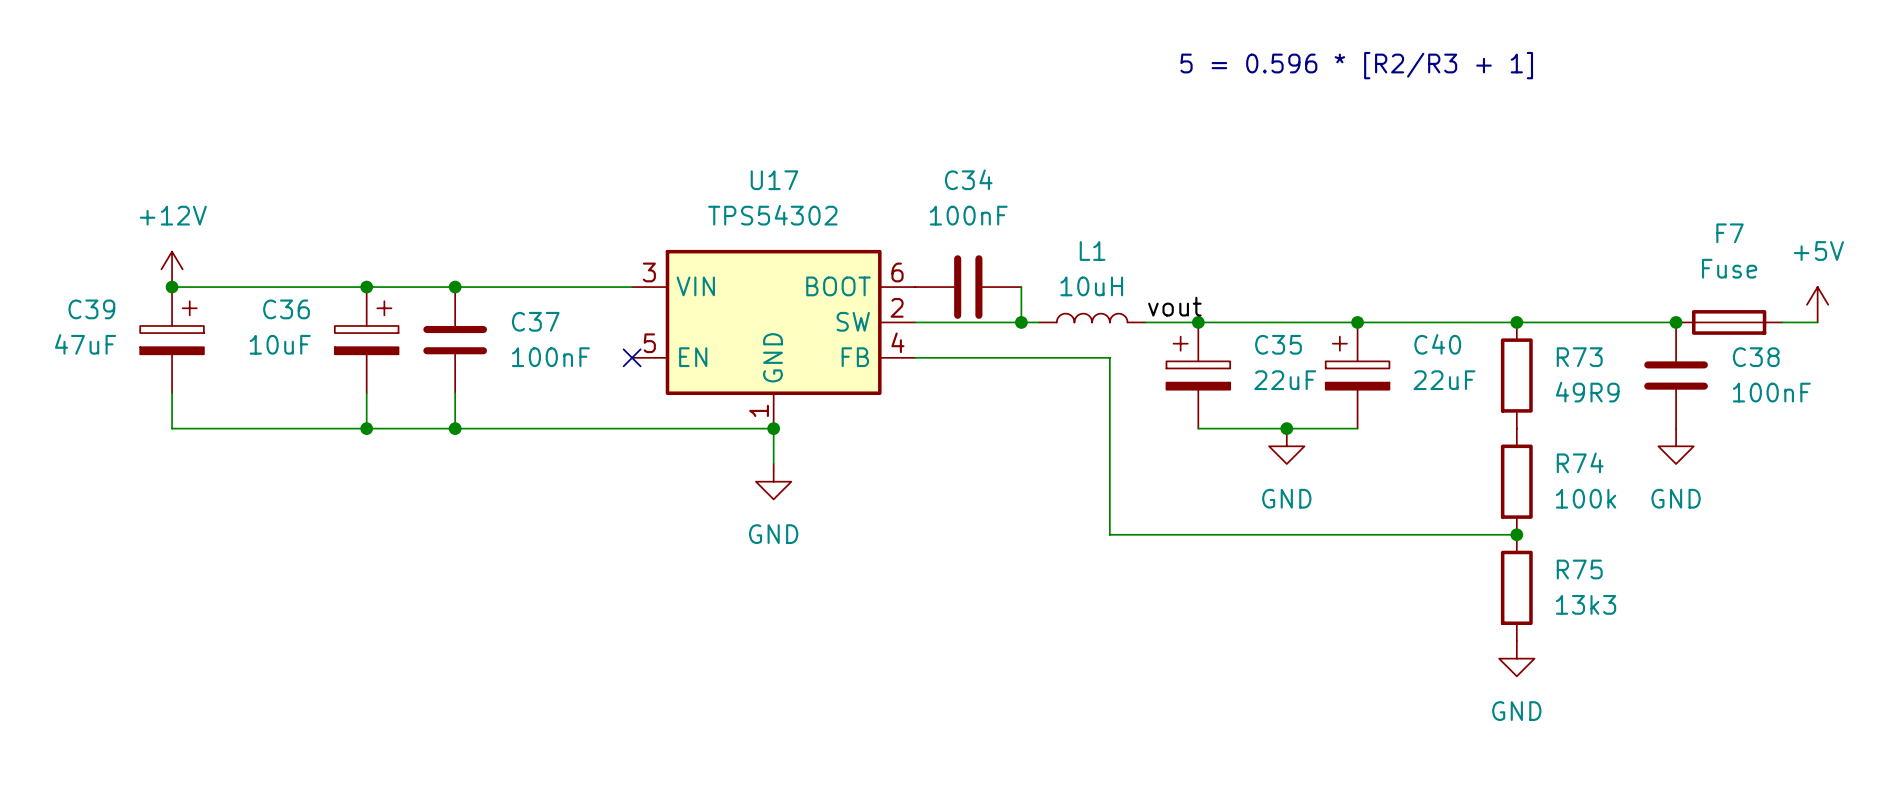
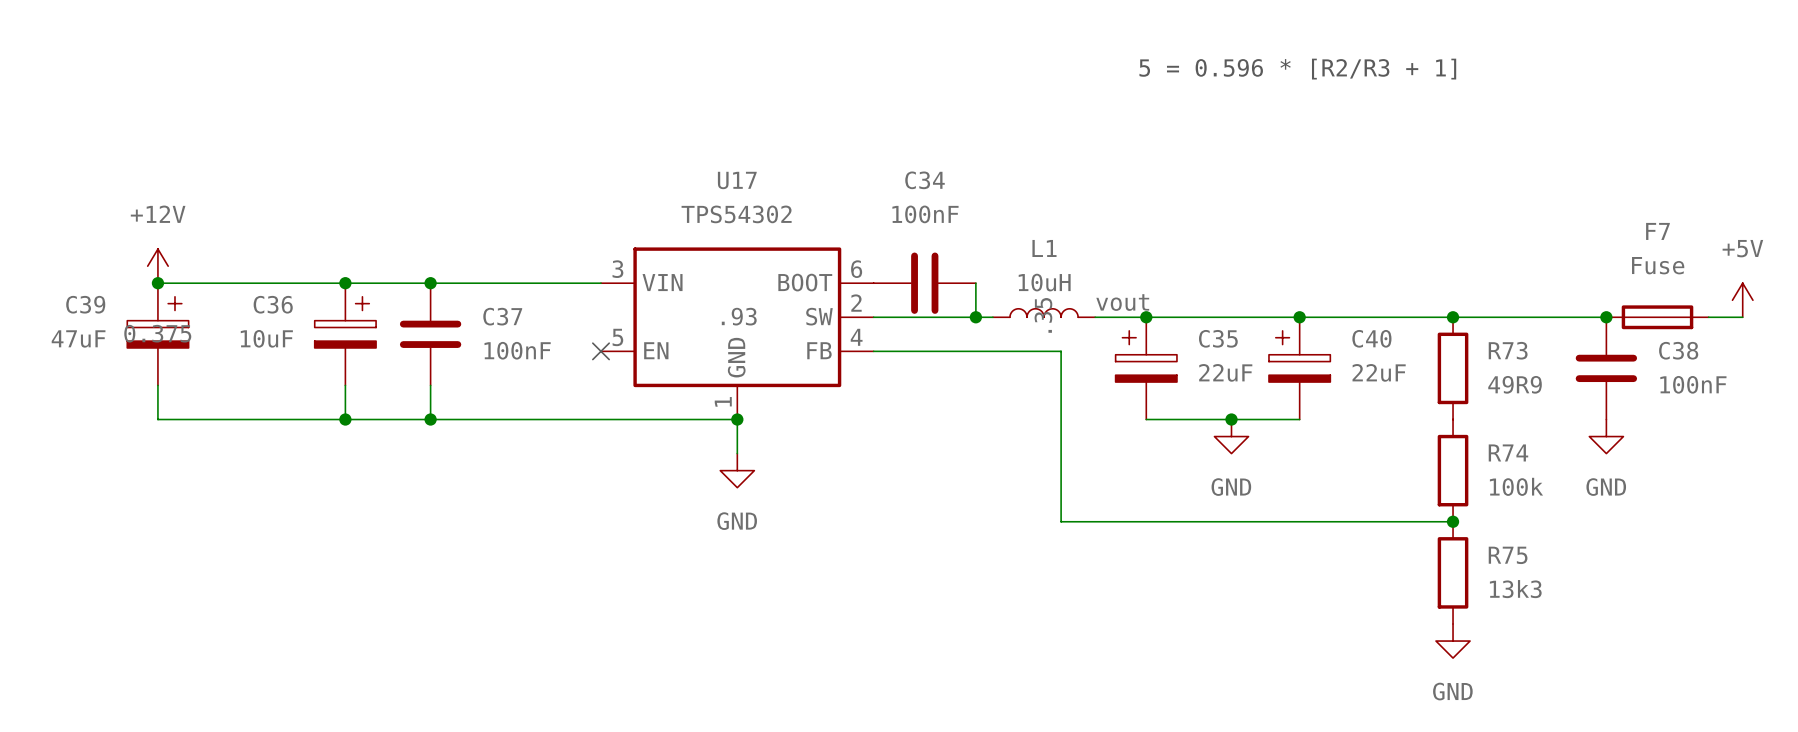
U17 text: none -> .93 (739, 316)
L1 text: none -> .35 (1043, 315)
C39 text: none -> 0.375 (157, 333)

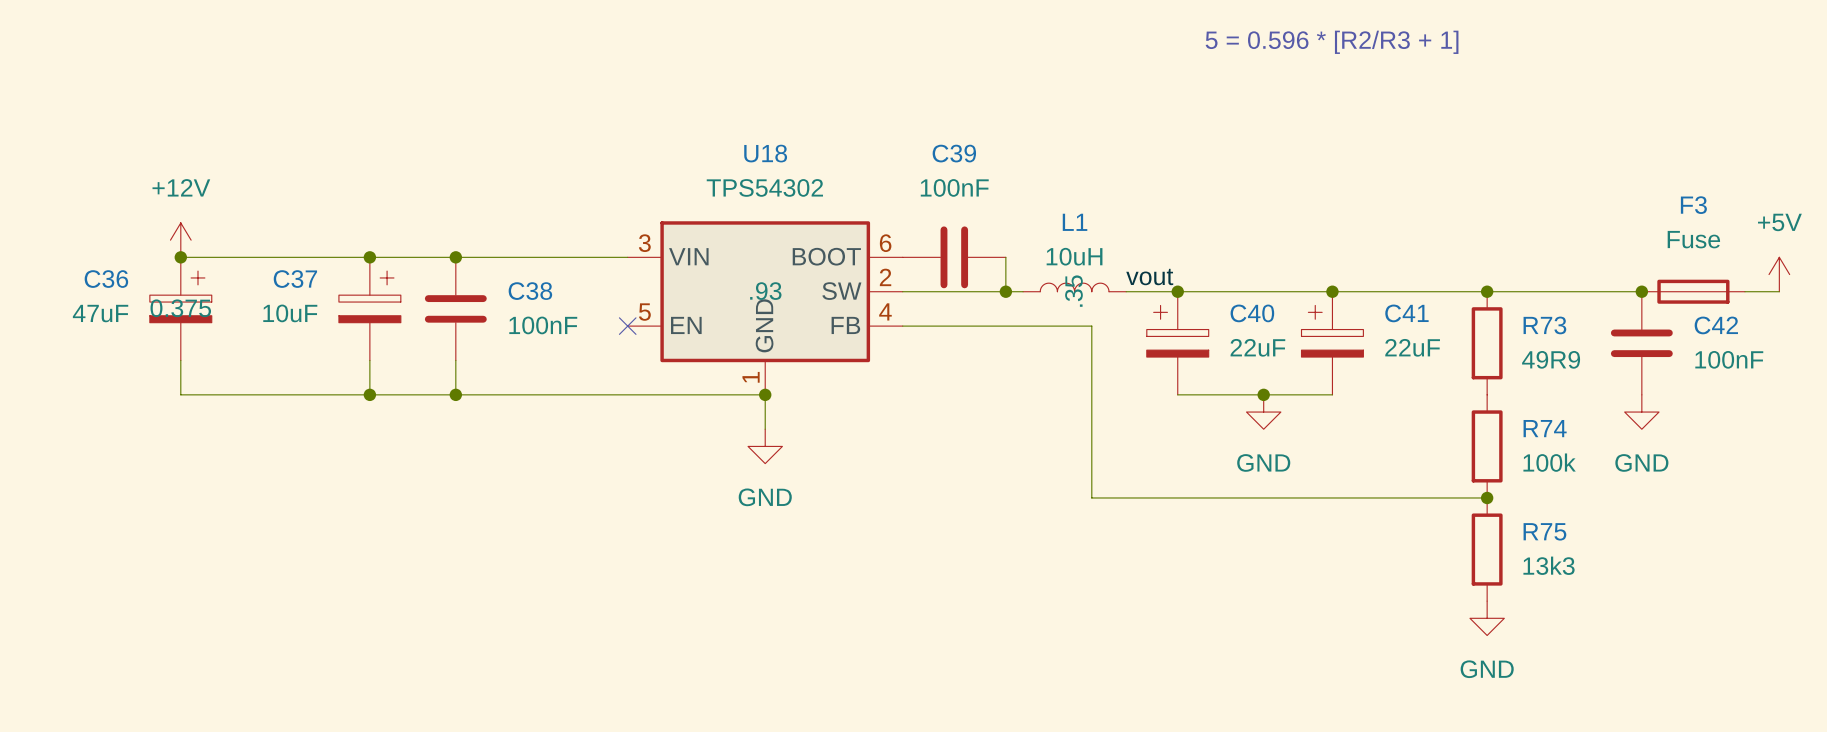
U17 name: U17 (737, 180) -> U18 (765, 153)
C34 name: C34 (925, 180) -> C39 (954, 153)
F7 name: F7 (1657, 231) -> F3 (1693, 205)
C39 name: C39 (85, 304) -> C36 (106, 279)
C36 name: C36 (273, 304) -> C37 (295, 279)
C37 name: C37 (502, 316) -> C38 (530, 291)
C35 name: C35 (1218, 338) -> C40 (1252, 313)
C40 name: C40 (1371, 338) -> C41 (1406, 313)
C38 name: C38 (1678, 350) -> C42 (1716, 325)

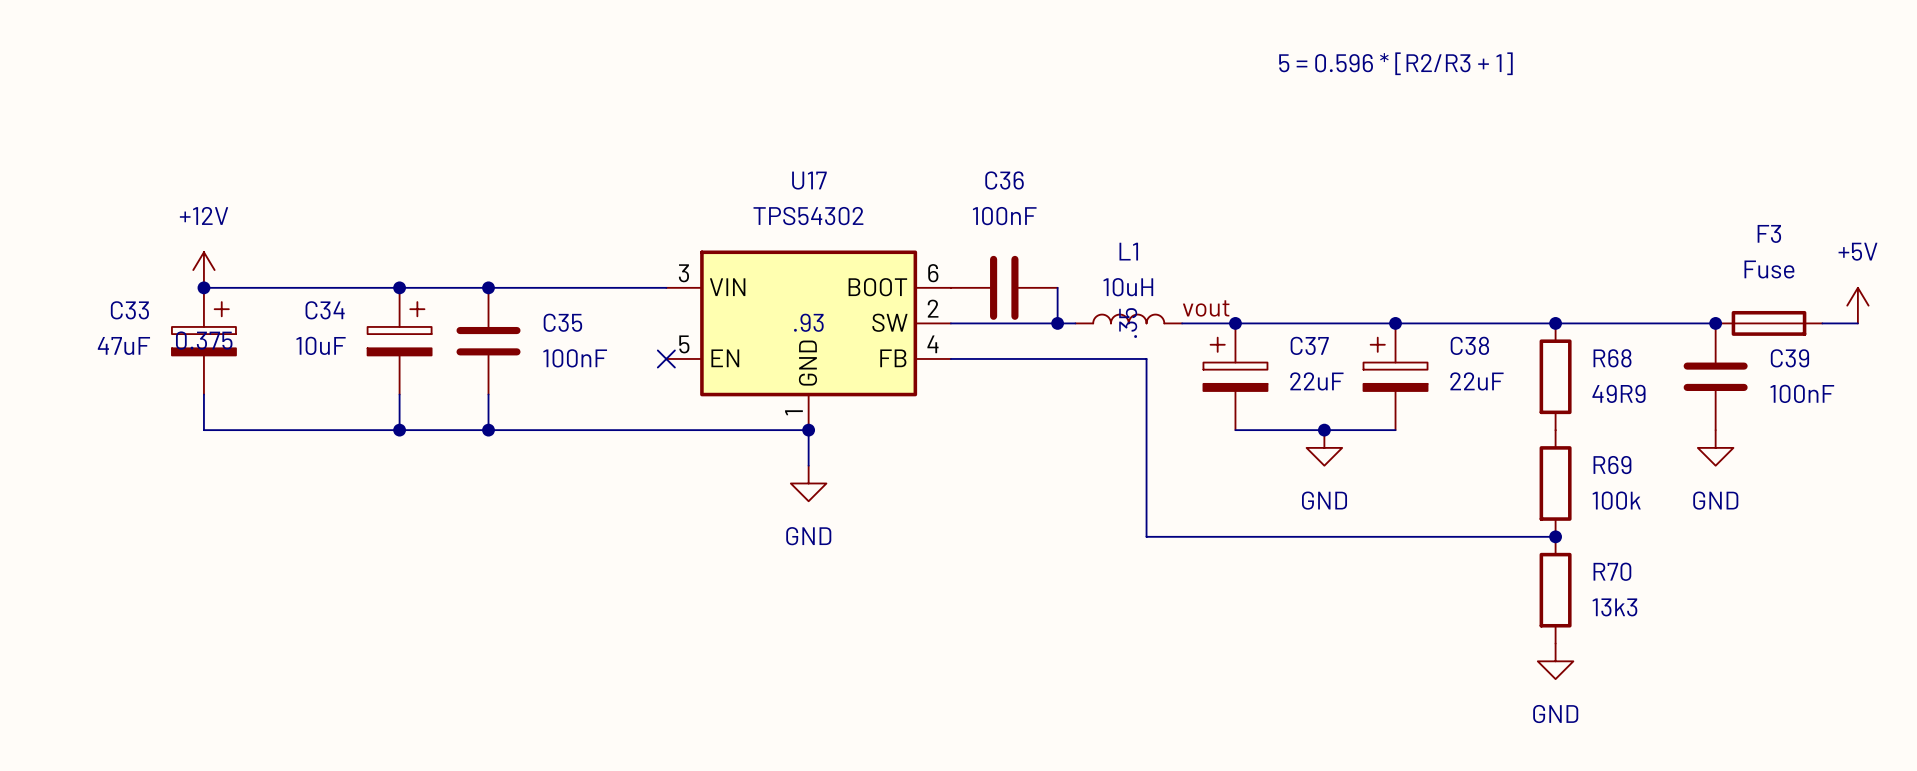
U18 name: U18 (765, 153) -> U17 (809, 180)
C39 name: C39 (954, 153) -> C36 (1004, 180)
C36 name: C36 (106, 279) -> C33 (129, 310)
C37 name: C37 (295, 279) -> C34 (325, 310)
C38 name: C38 (530, 291) -> C35 (562, 322)
C40 name: C40 (1252, 313) -> C37 (1309, 345)
C41 name: C41 (1406, 313) -> C38 (1469, 345)
R73 name: R73 (1544, 325) -> R68 (1612, 358)
C42 name: C42 (1716, 325) -> C39 (1789, 358)
R74 name: R74 (1545, 428) -> R69 (1612, 465)
R75 name: R75 (1544, 531) -> R70 (1612, 571)

